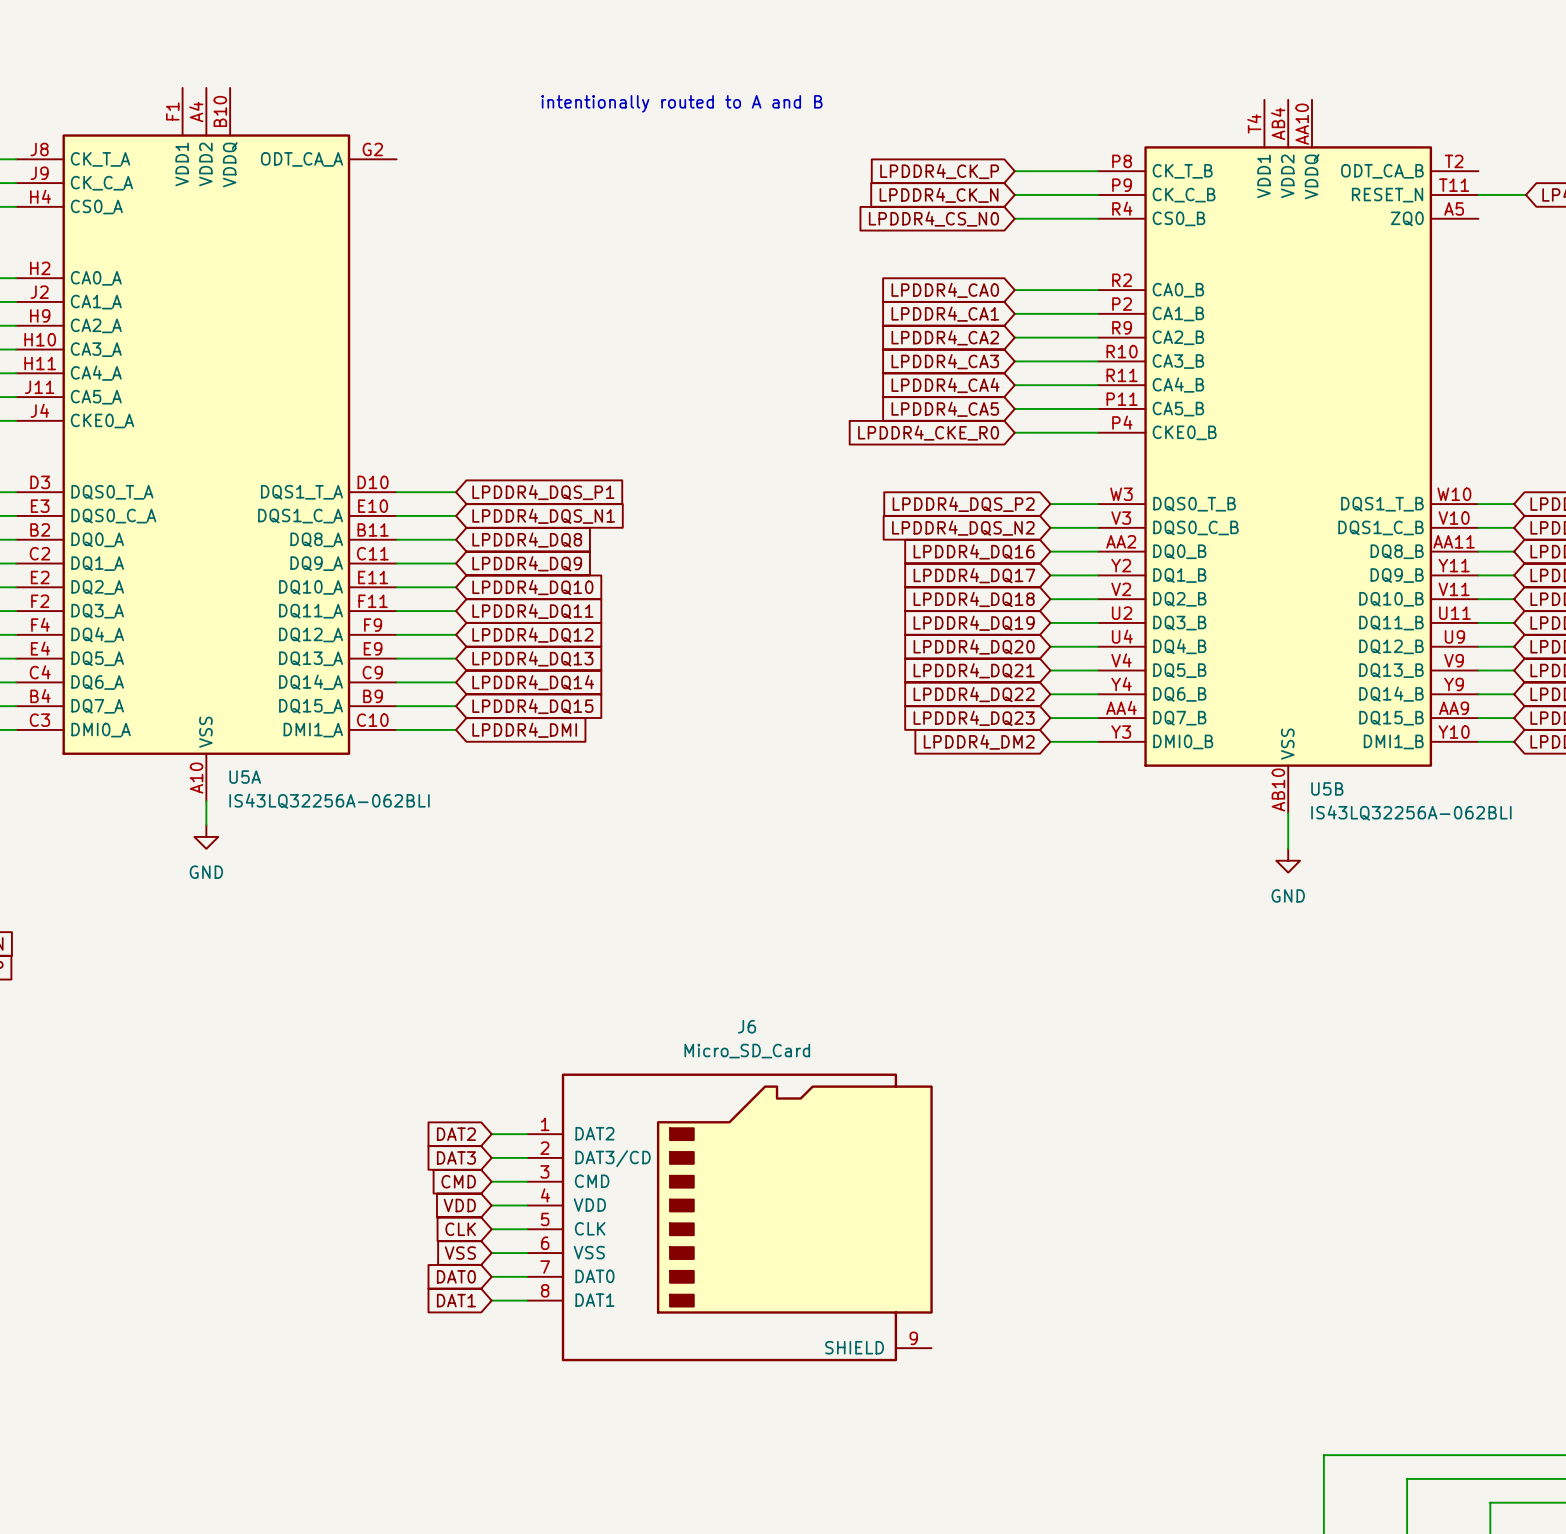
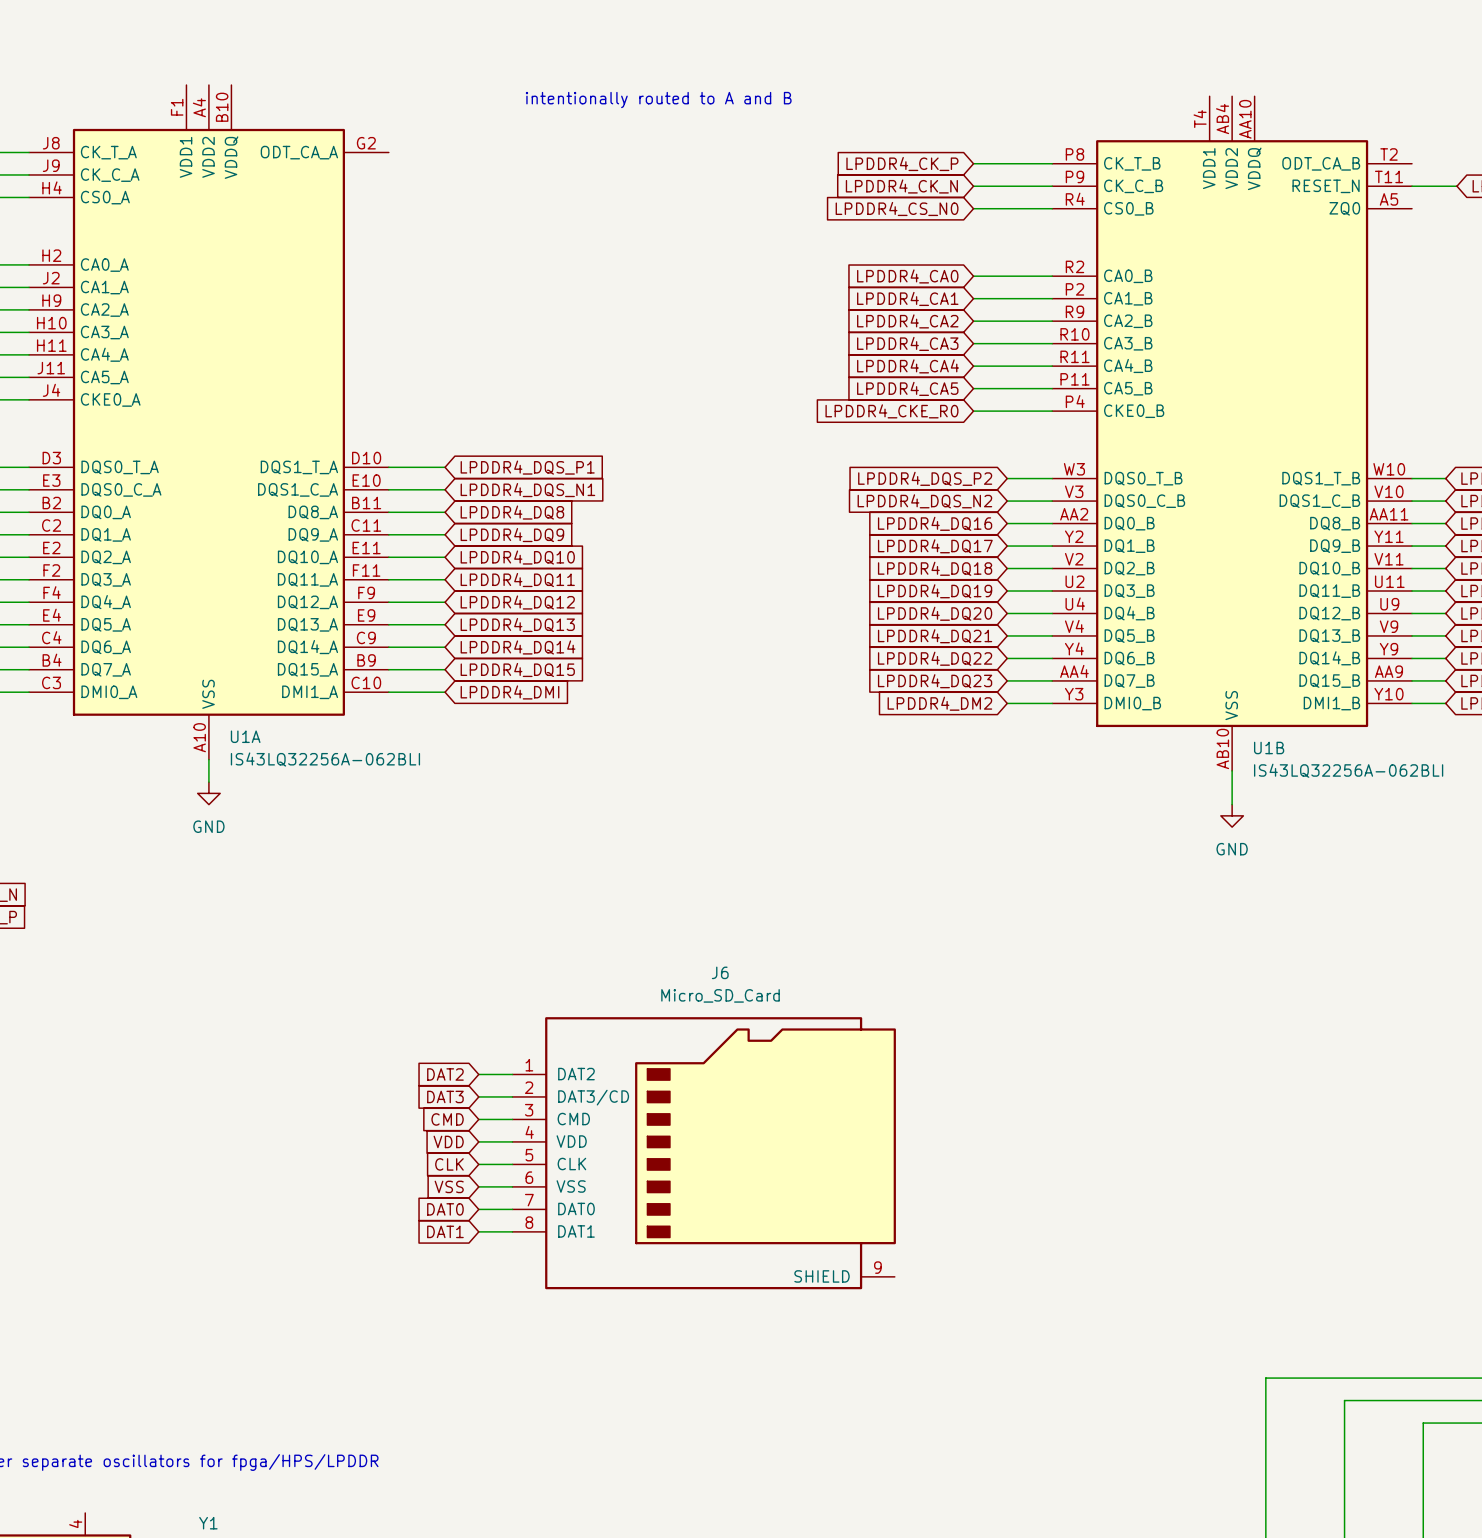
U5A name: U5A (245, 777) -> U1A (245, 736)
U5B name: U5B (1327, 788) -> U1B (1269, 747)

